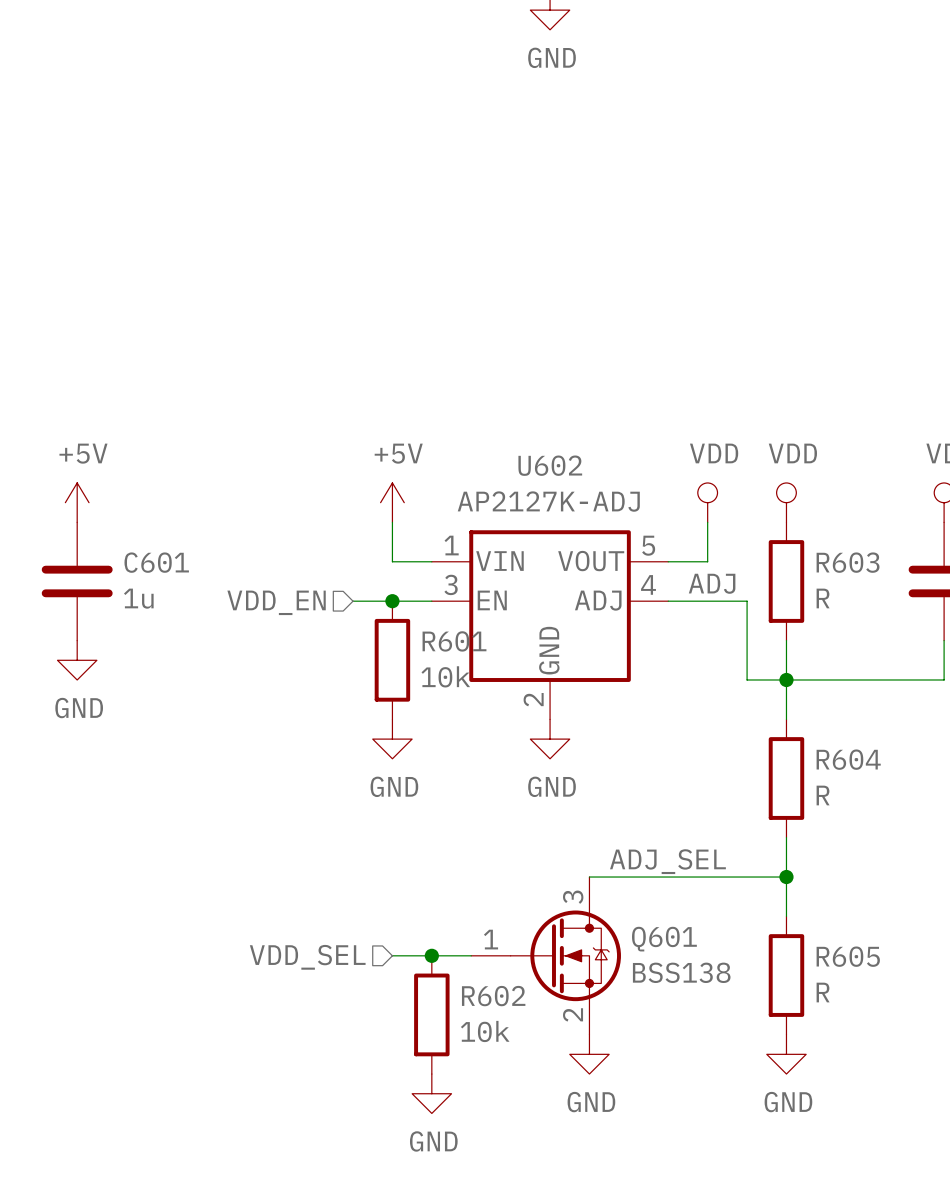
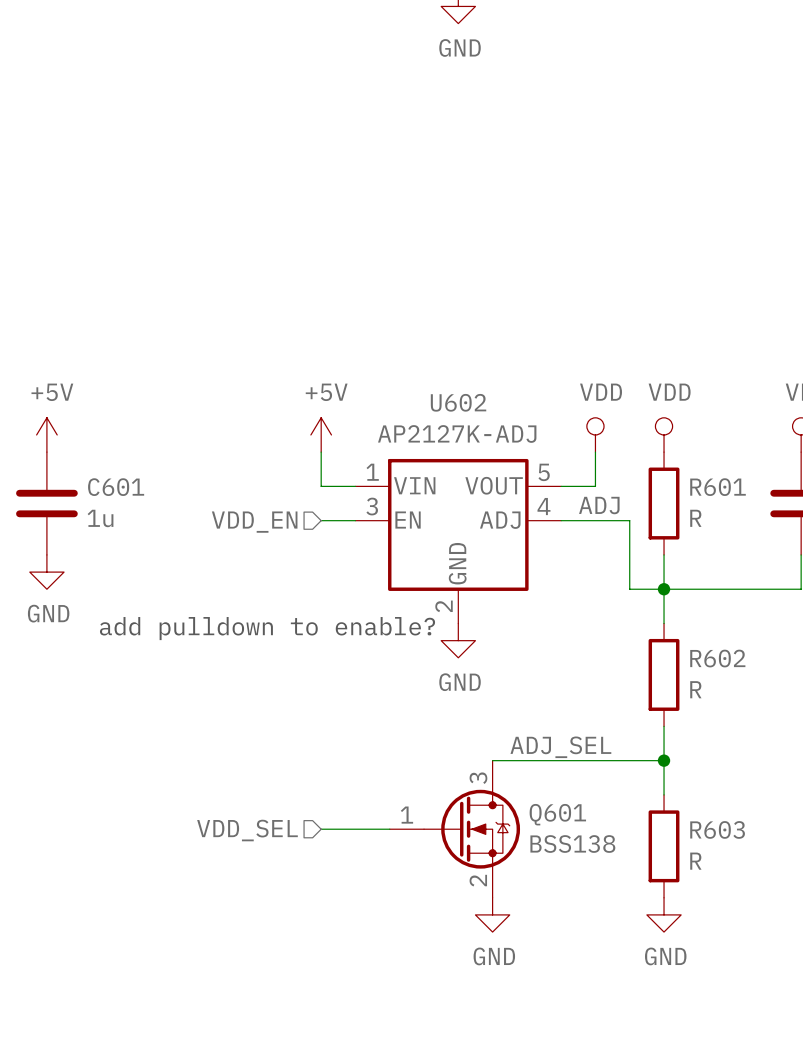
R603 name: R603 (848, 562) -> R601 (718, 487)
wire: (353, 601) (392, 601) -> none
junction: (392, 601) -> none
hierarchical label position: VDD_EN (276, 602) -> VDD_EN (254, 522)
R601: 10k (392, 660) -> none
text: none -> add pulldown to enable? (267, 628)
power symbol: GND (392, 739) -> none
R604 name: R604 (848, 759) -> R602 (717, 658)
junction: (431, 955) -> none
R605 name: R605 (848, 956) -> R603 (717, 829)
R602: 10k (431, 1014) -> none
power symbol: GND (431, 1093) -> none

